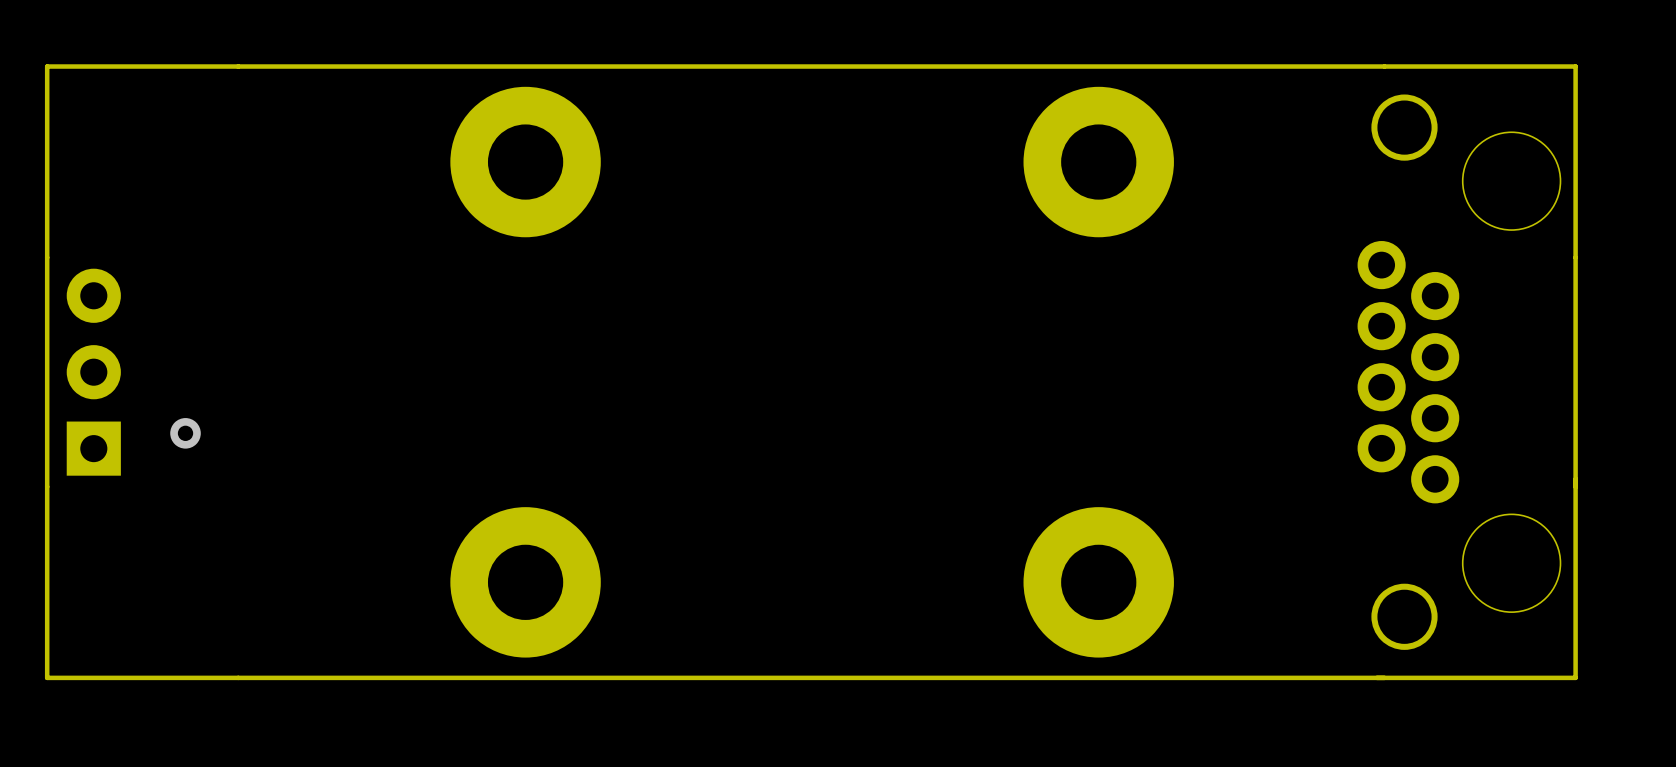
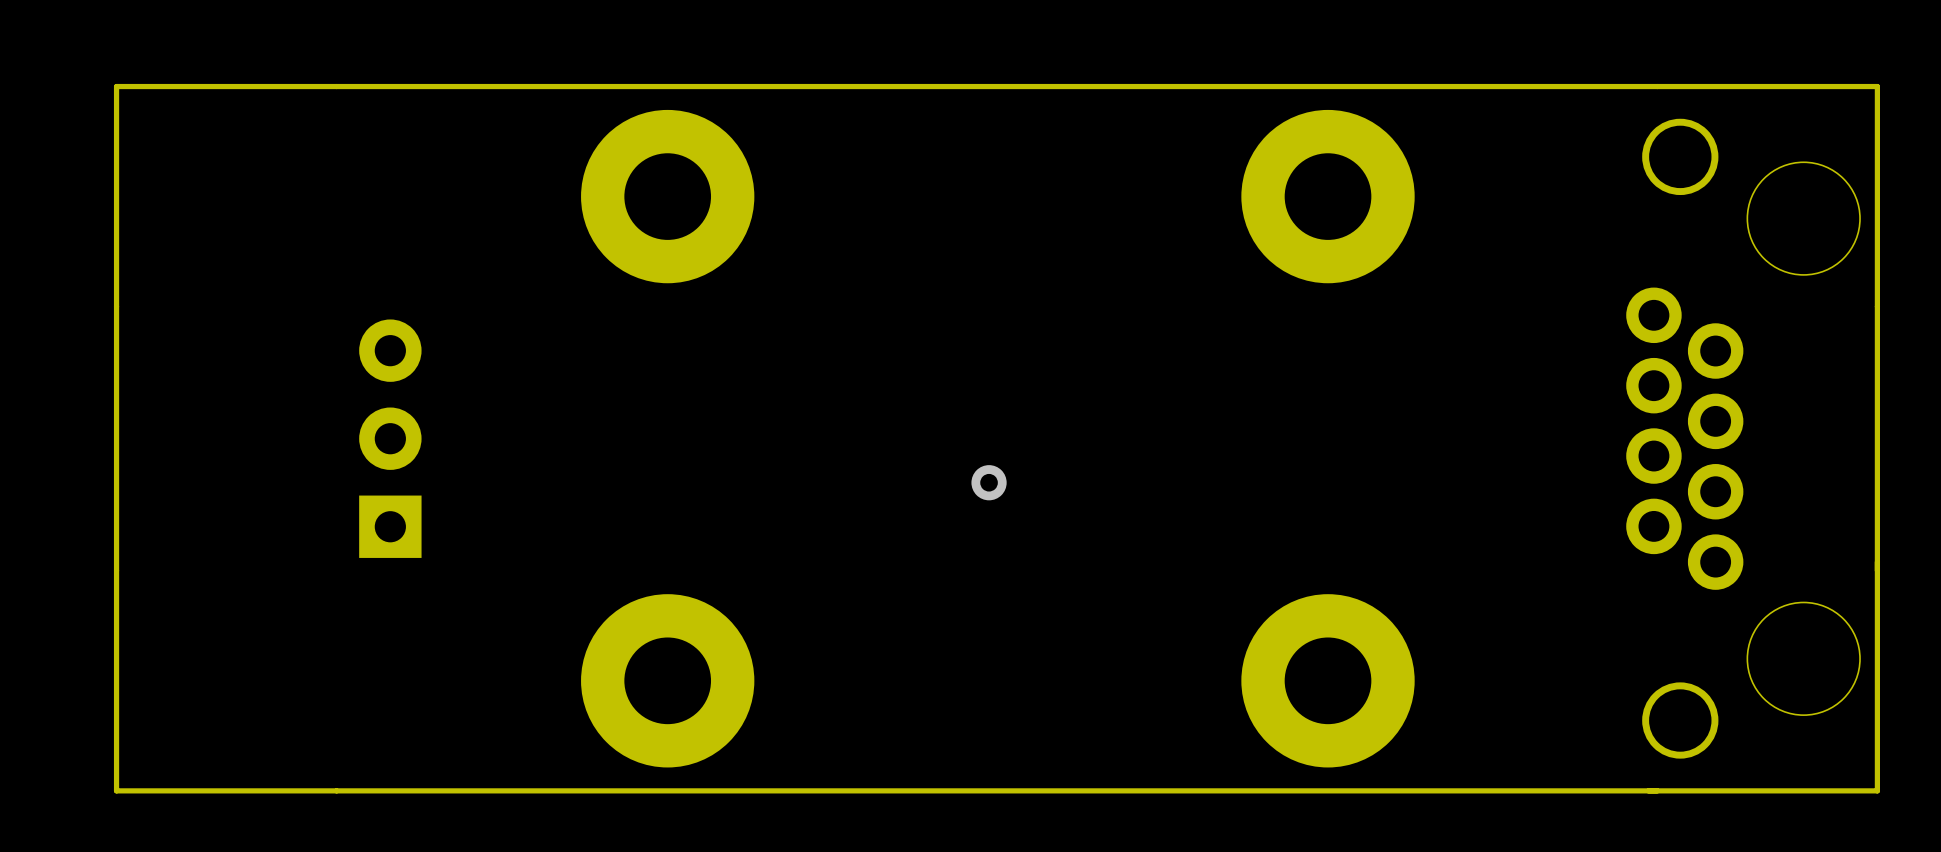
part position: (93, 372) -> (390, 438)
via: none -> (989, 482)
via: (185, 433) -> none

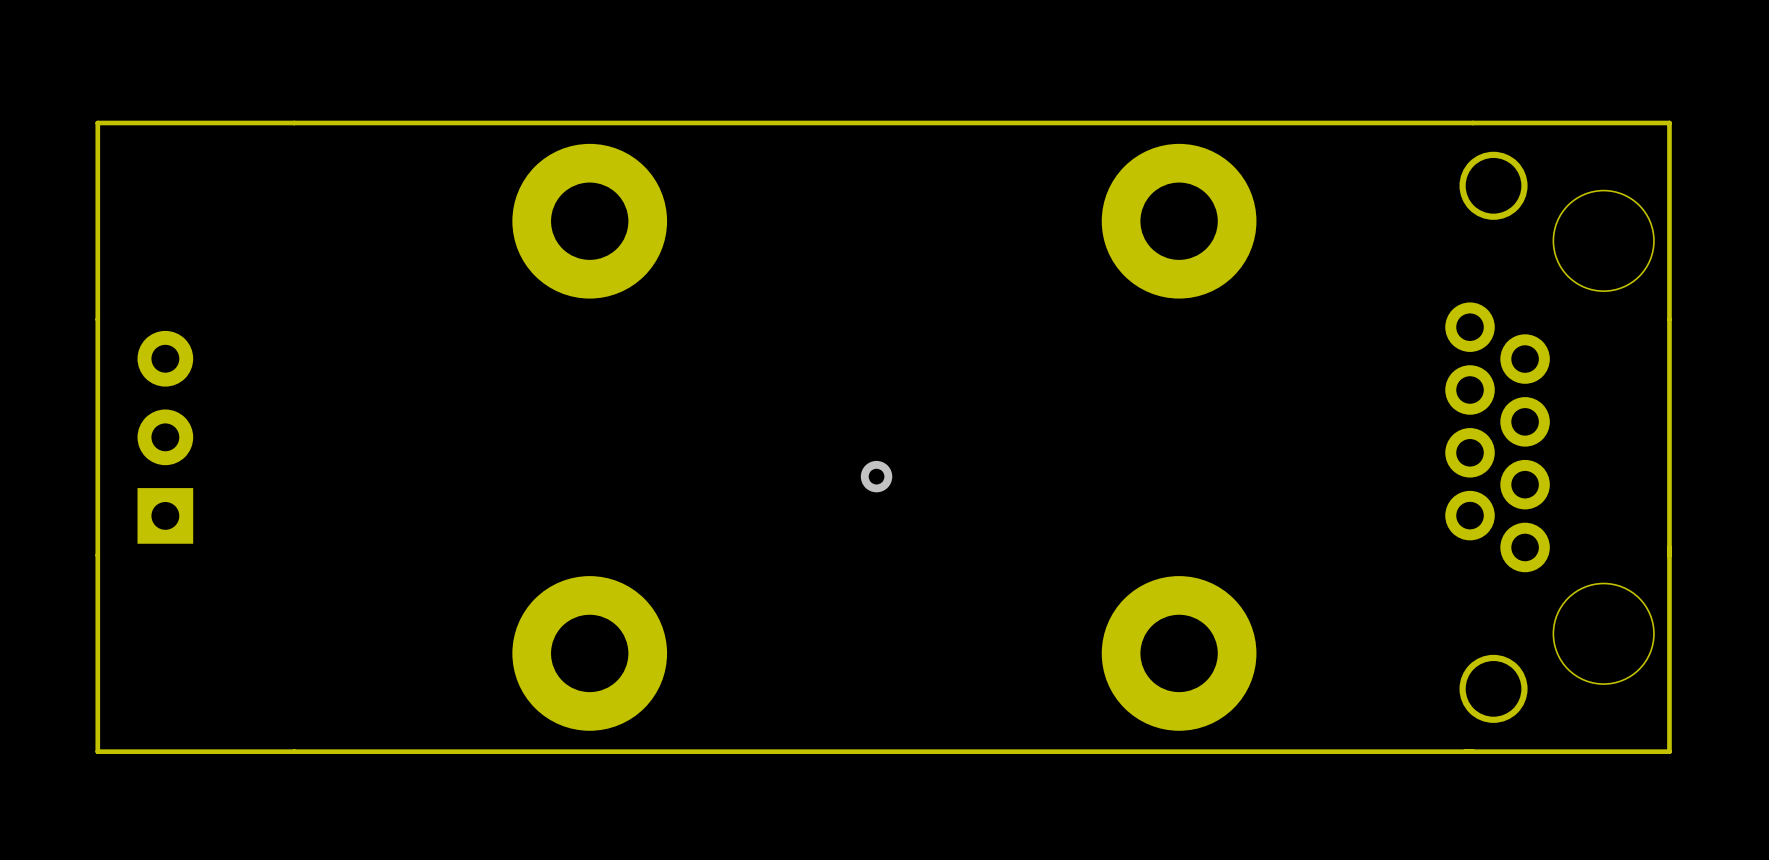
part position: (390, 438) -> (165, 437)

